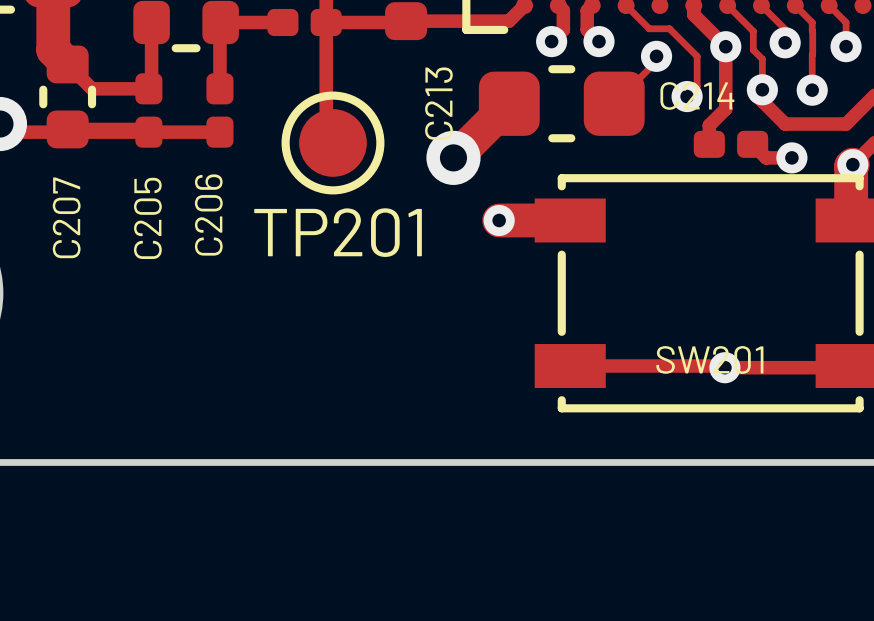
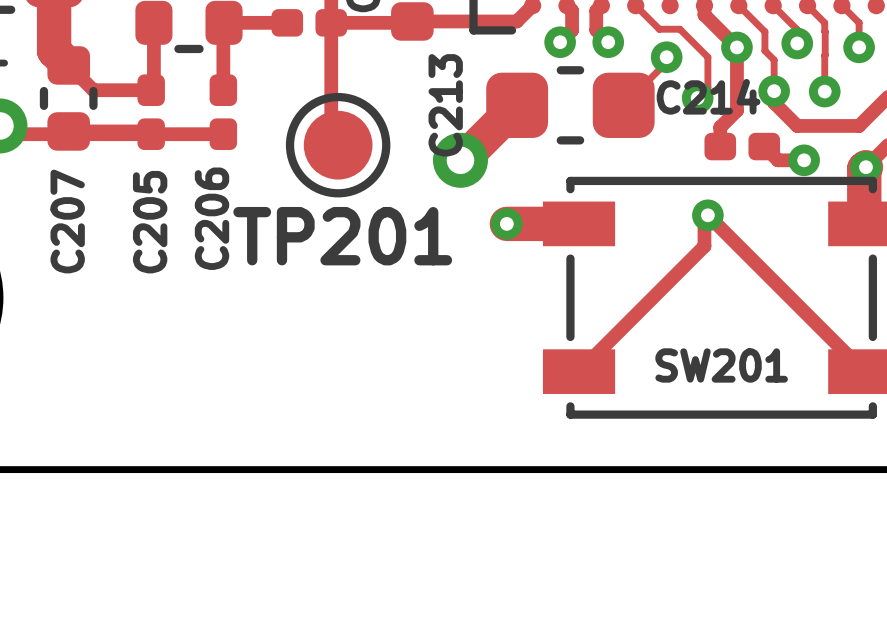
via: none -> (707, 215)
track: (570, 366) (723, 366) (724, 367) (849, 367) (851, 366) -> (579, 371) (704, 246) (704, 211) (864, 371)
via: (724, 367) -> none

